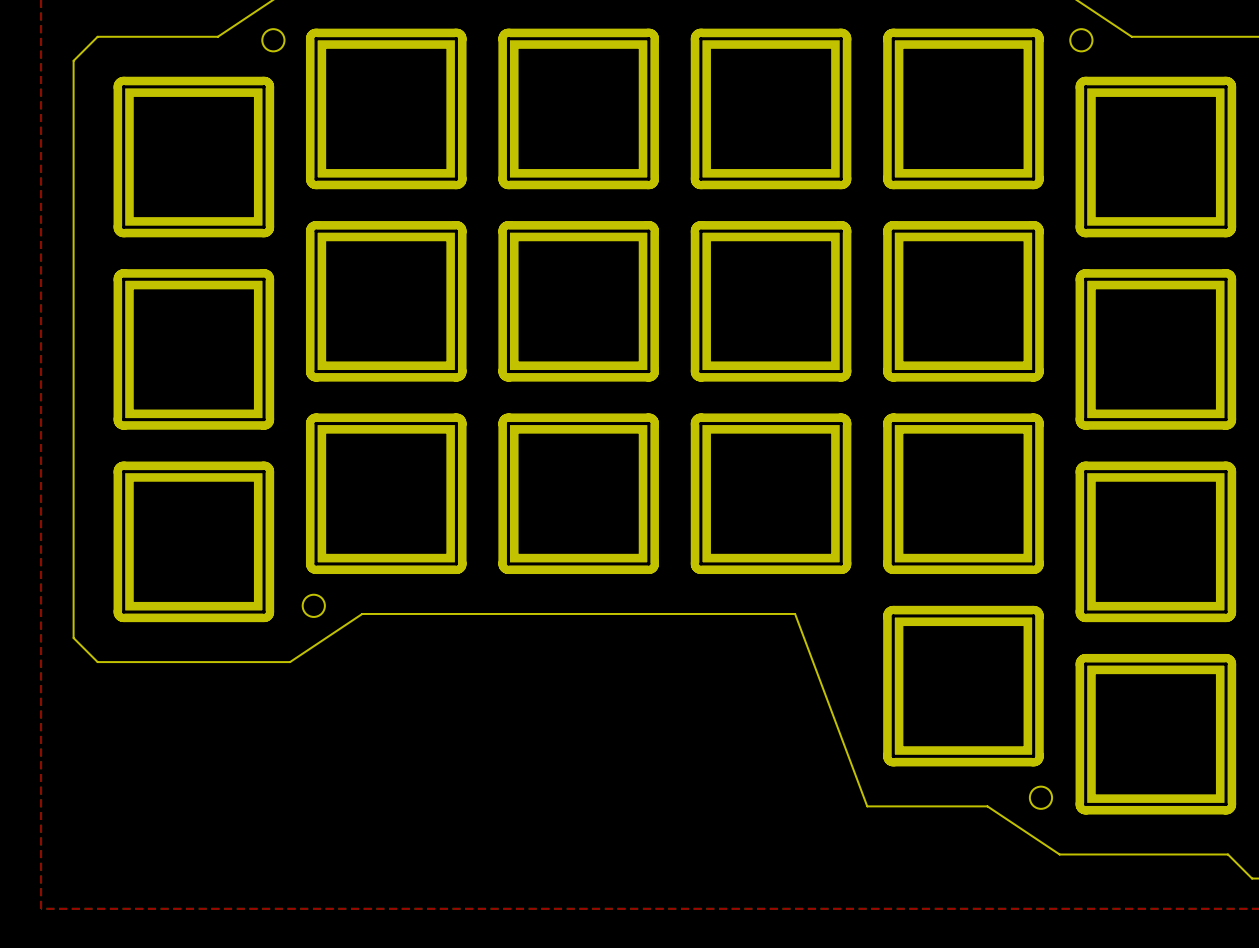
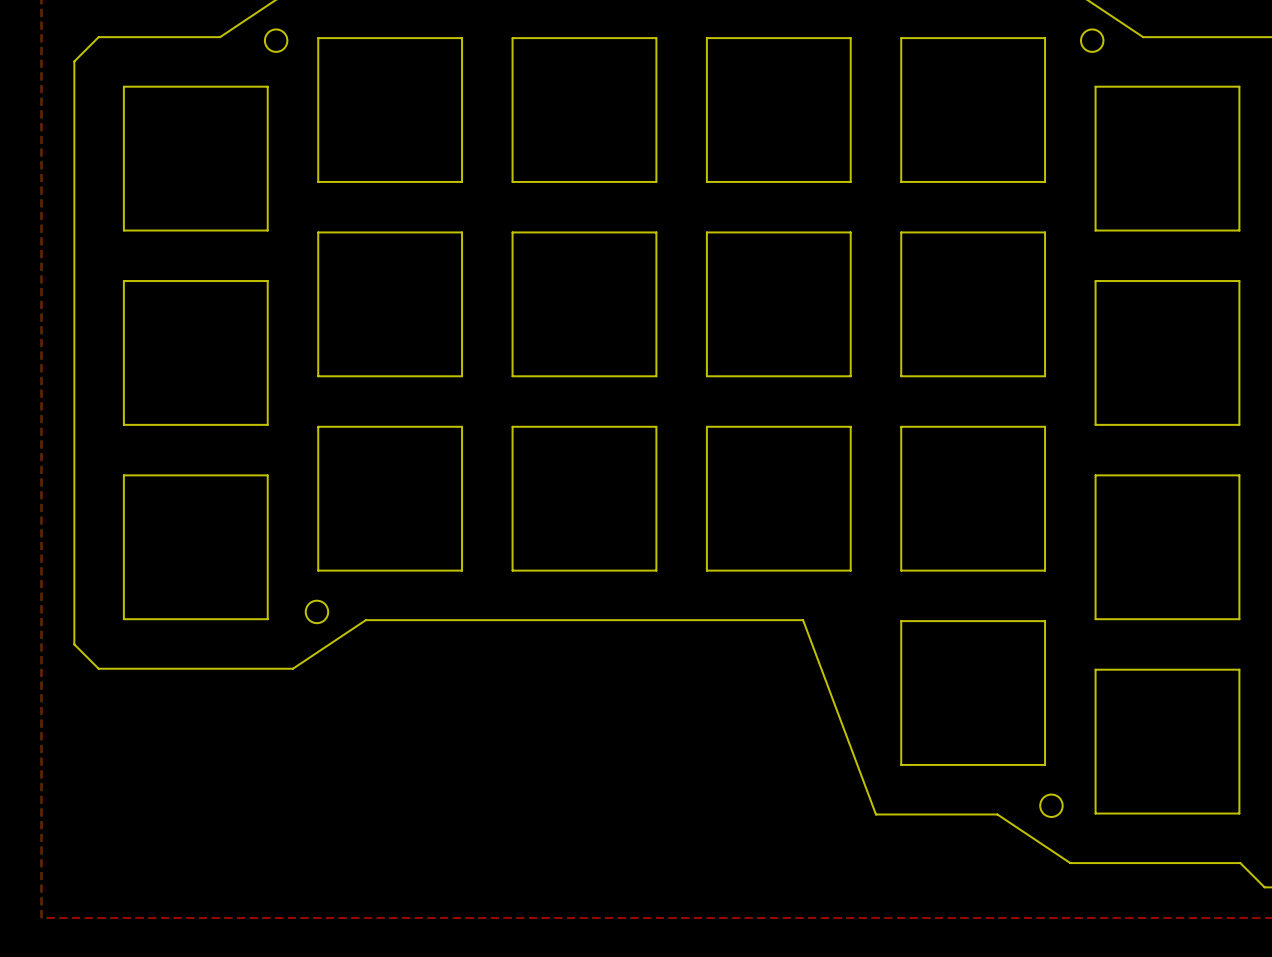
drawing: none -> [317, 37, 463, 183]
drawing: none -> [511, 37, 658, 183]
drawing: none -> [706, 37, 852, 183]
drawing: none -> [900, 37, 1046, 183]
drawing: none -> [123, 85, 269, 232]
drawing: none -> [1094, 85, 1241, 232]
part: (386, 108) -> none
part: (578, 108) -> none
part: (771, 108) -> none
part: (963, 108) -> none
part: (193, 157) -> none
part: (1155, 157) -> none
drawing: none -> [317, 231, 463, 378]
drawing: none -> [511, 231, 658, 378]
drawing: none -> [706, 231, 852, 378]
drawing: none -> [900, 231, 1046, 378]
drawing: none -> [123, 280, 269, 426]
drawing: none -> [1094, 280, 1241, 426]
part: (386, 301) -> none
part: (578, 301) -> none
part: (771, 301) -> none
part: (963, 301) -> none
part: (193, 349) -> none
part: (1155, 349) -> none
drawing: none -> [317, 426, 463, 572]
drawing: none -> [511, 426, 658, 572]
drawing: none -> [706, 426, 852, 572]
drawing: none -> [900, 426, 1046, 572]
drawing: none -> [123, 474, 269, 620]
drawing: none -> [1094, 474, 1241, 620]
part: (386, 493) -> none
part: (578, 493) -> none
part: (771, 493) -> none
part: (963, 493) -> none
part: (193, 541) -> none
part: (1155, 541) -> none
drawing: none -> [900, 620, 1046, 766]
drawing: none -> [1094, 668, 1241, 815]
part: (963, 686) -> none
part: (1155, 734) -> none

